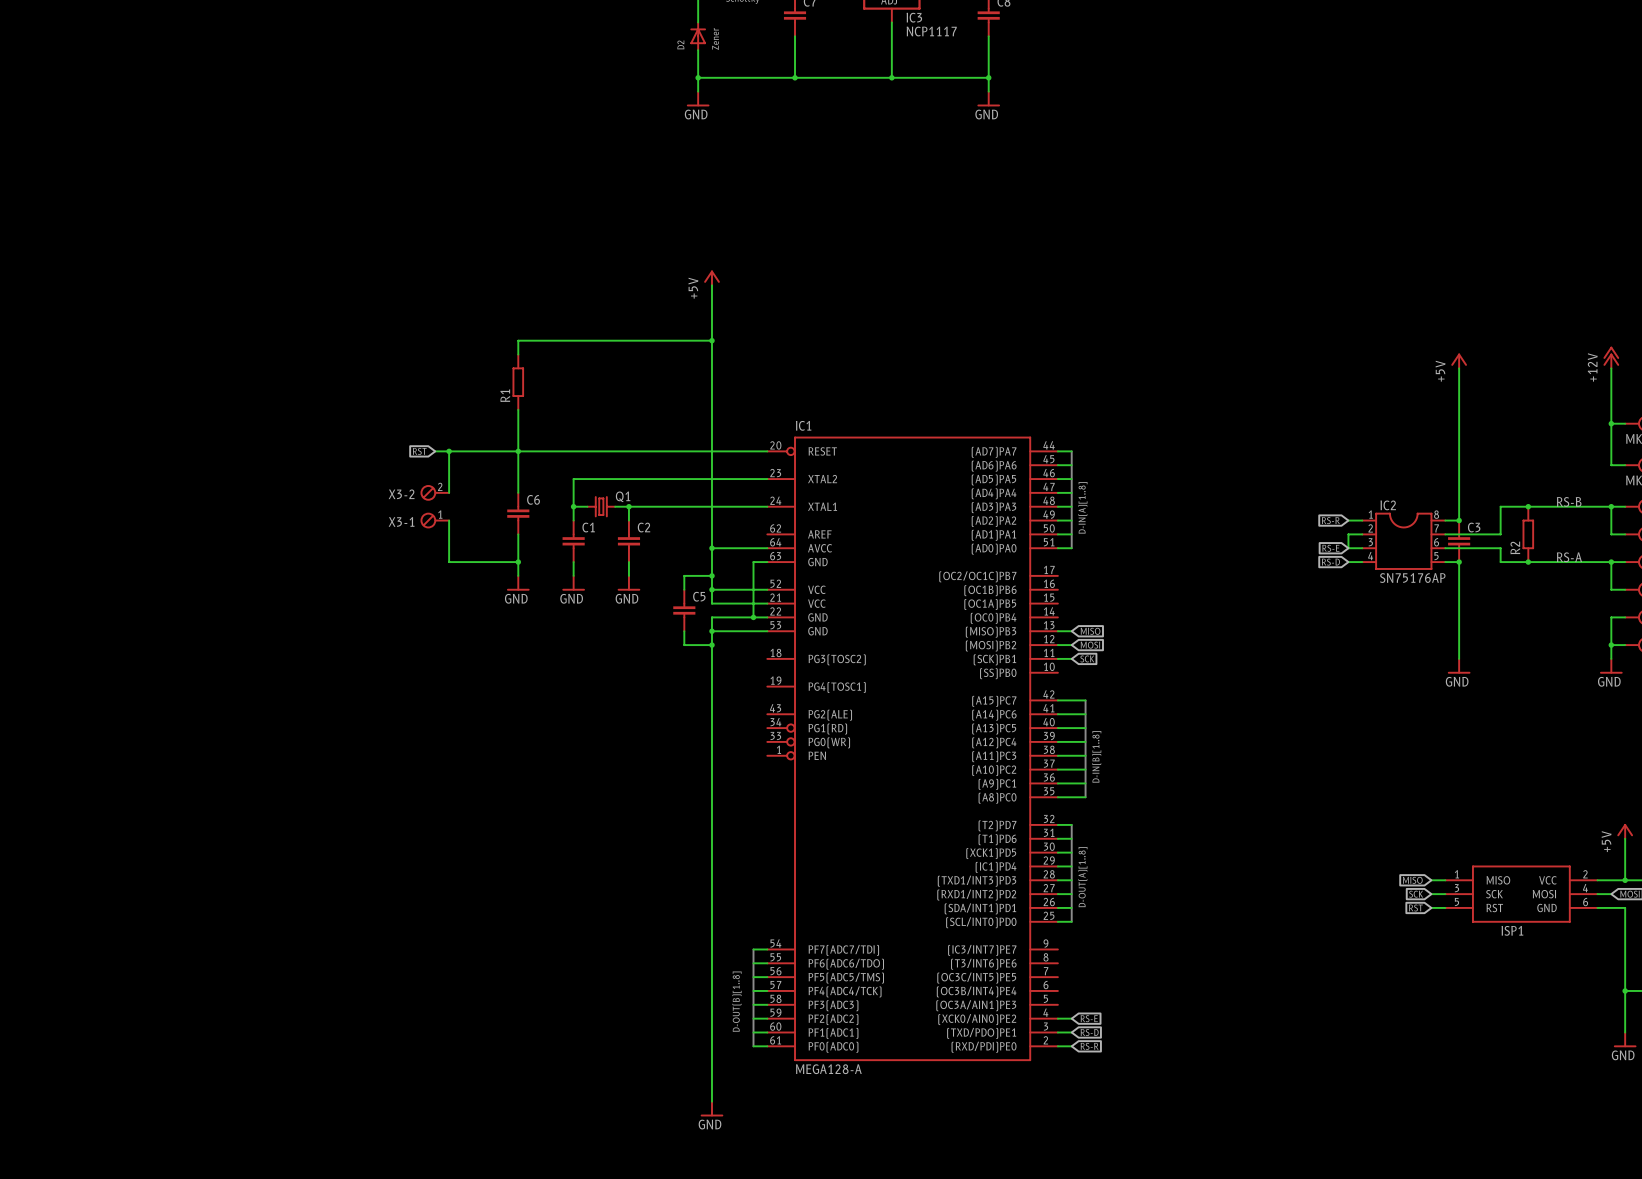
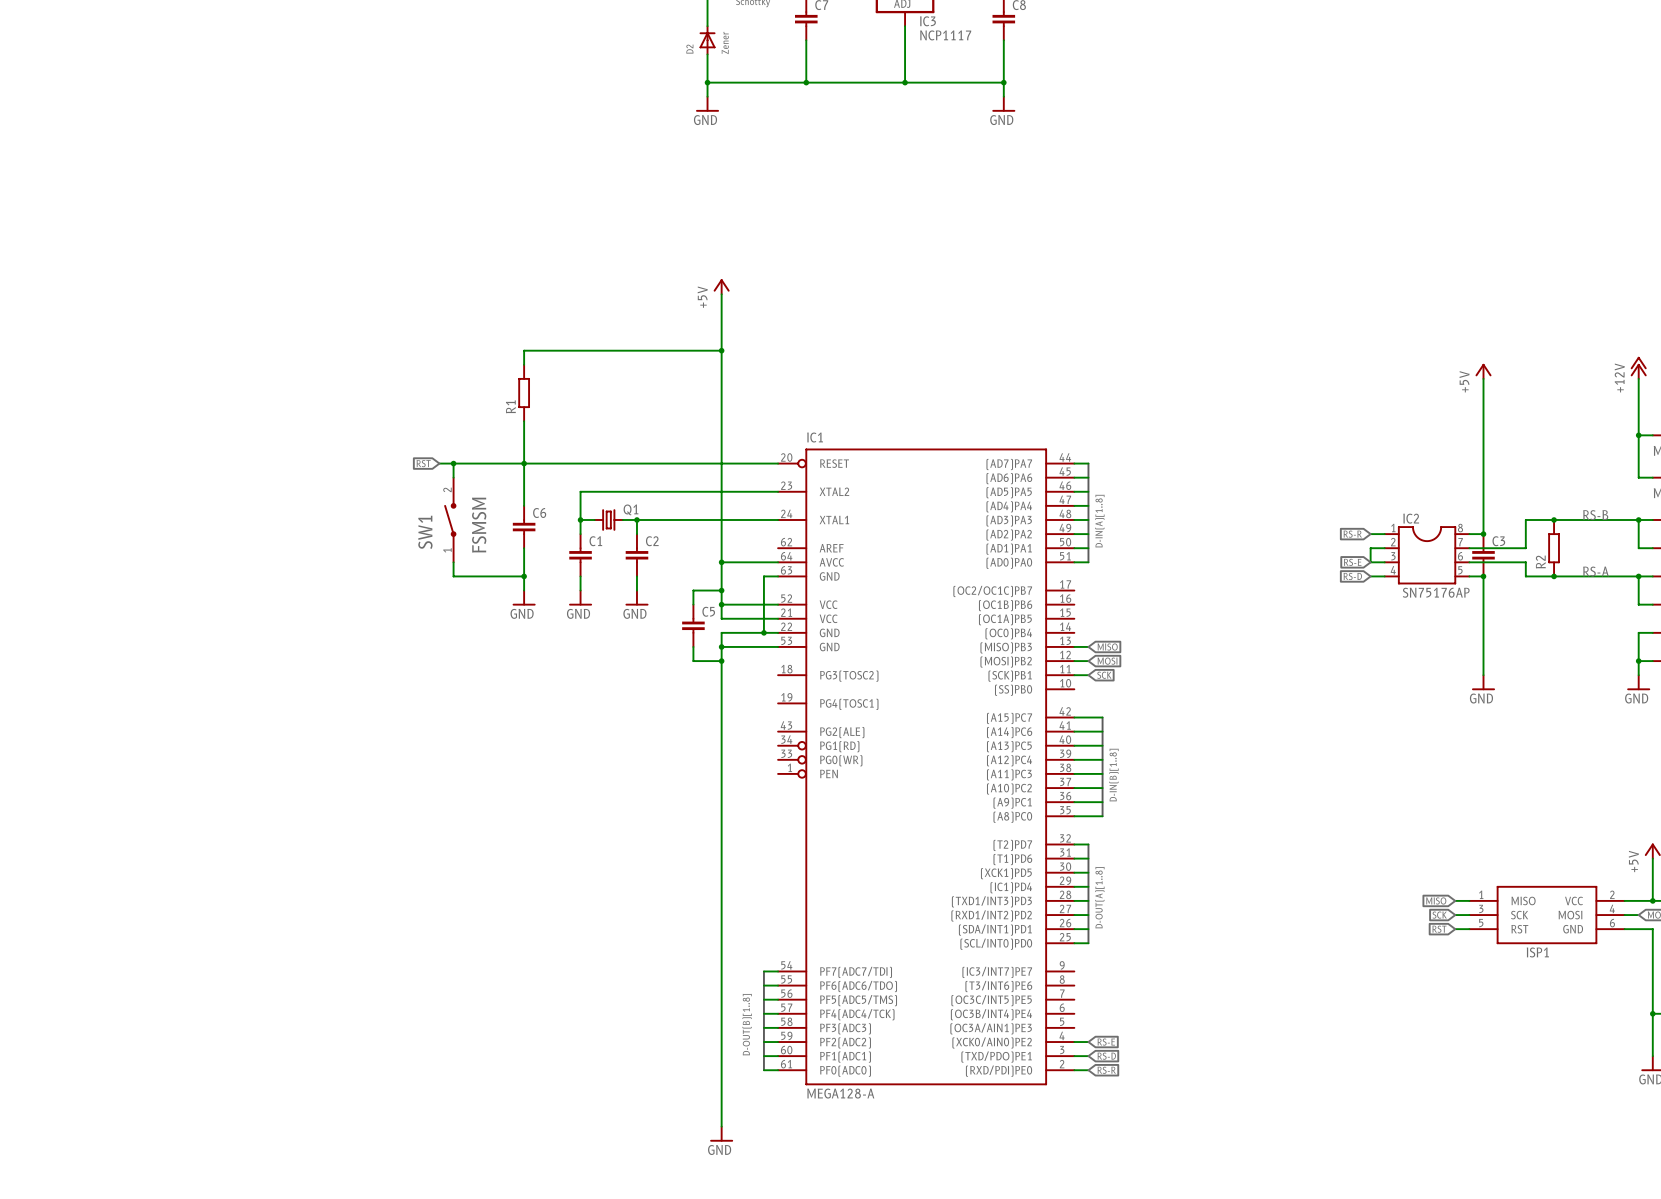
X3-2: (434, 492) -> none
SW1: none -> FSMSM (450, 519)
X3-1: (434, 520) -> none

